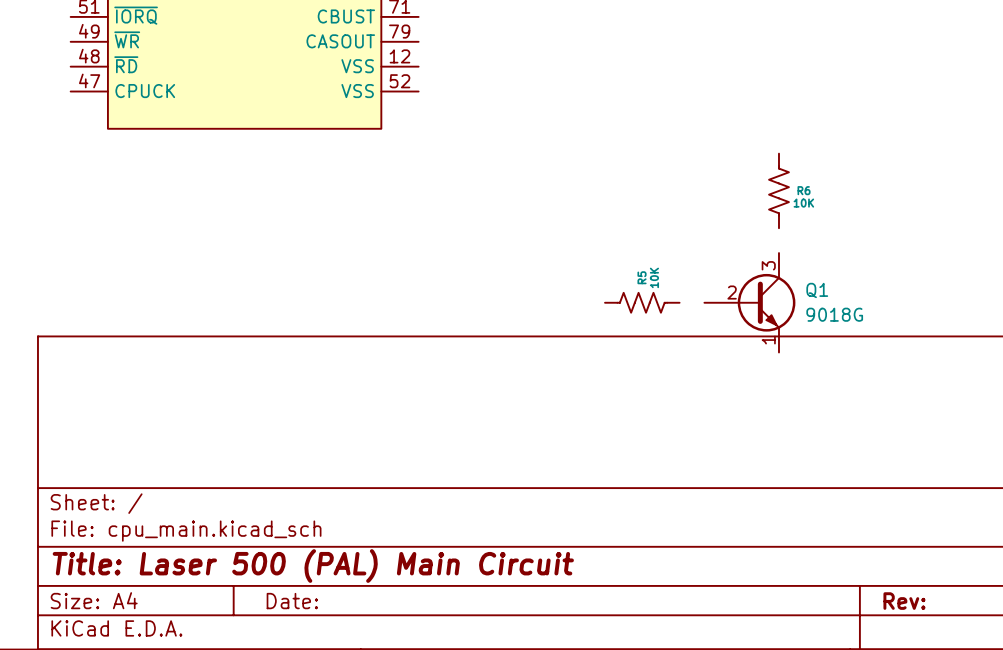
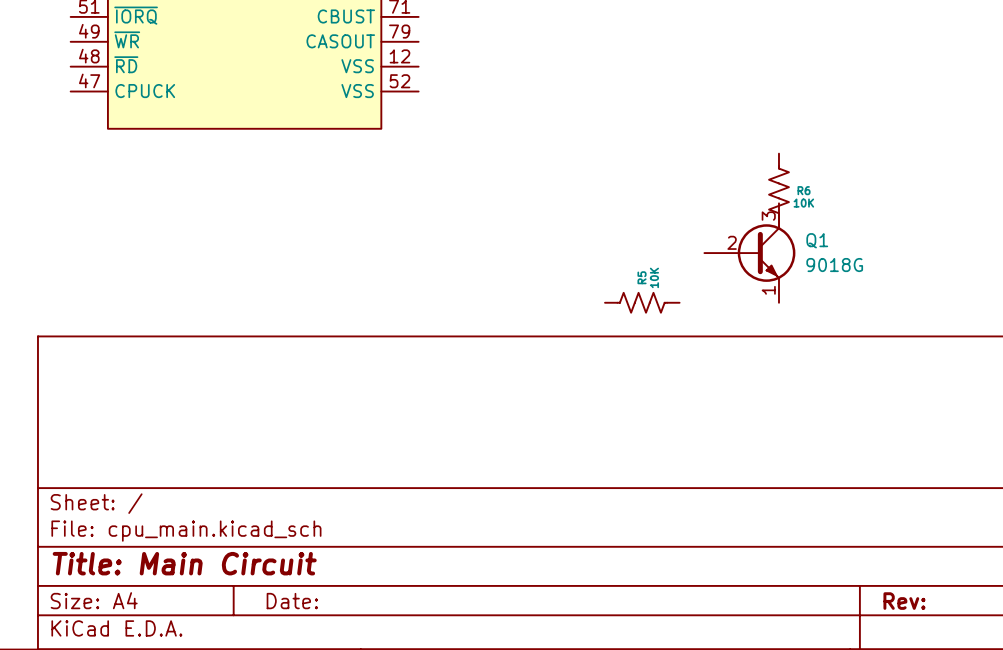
Q1 position: (749, 302) -> (749, 253)
title block: Title: Laser 500 (PAL) Main Circuit (313, 566) -> Title: Main Circuit (184, 563)

